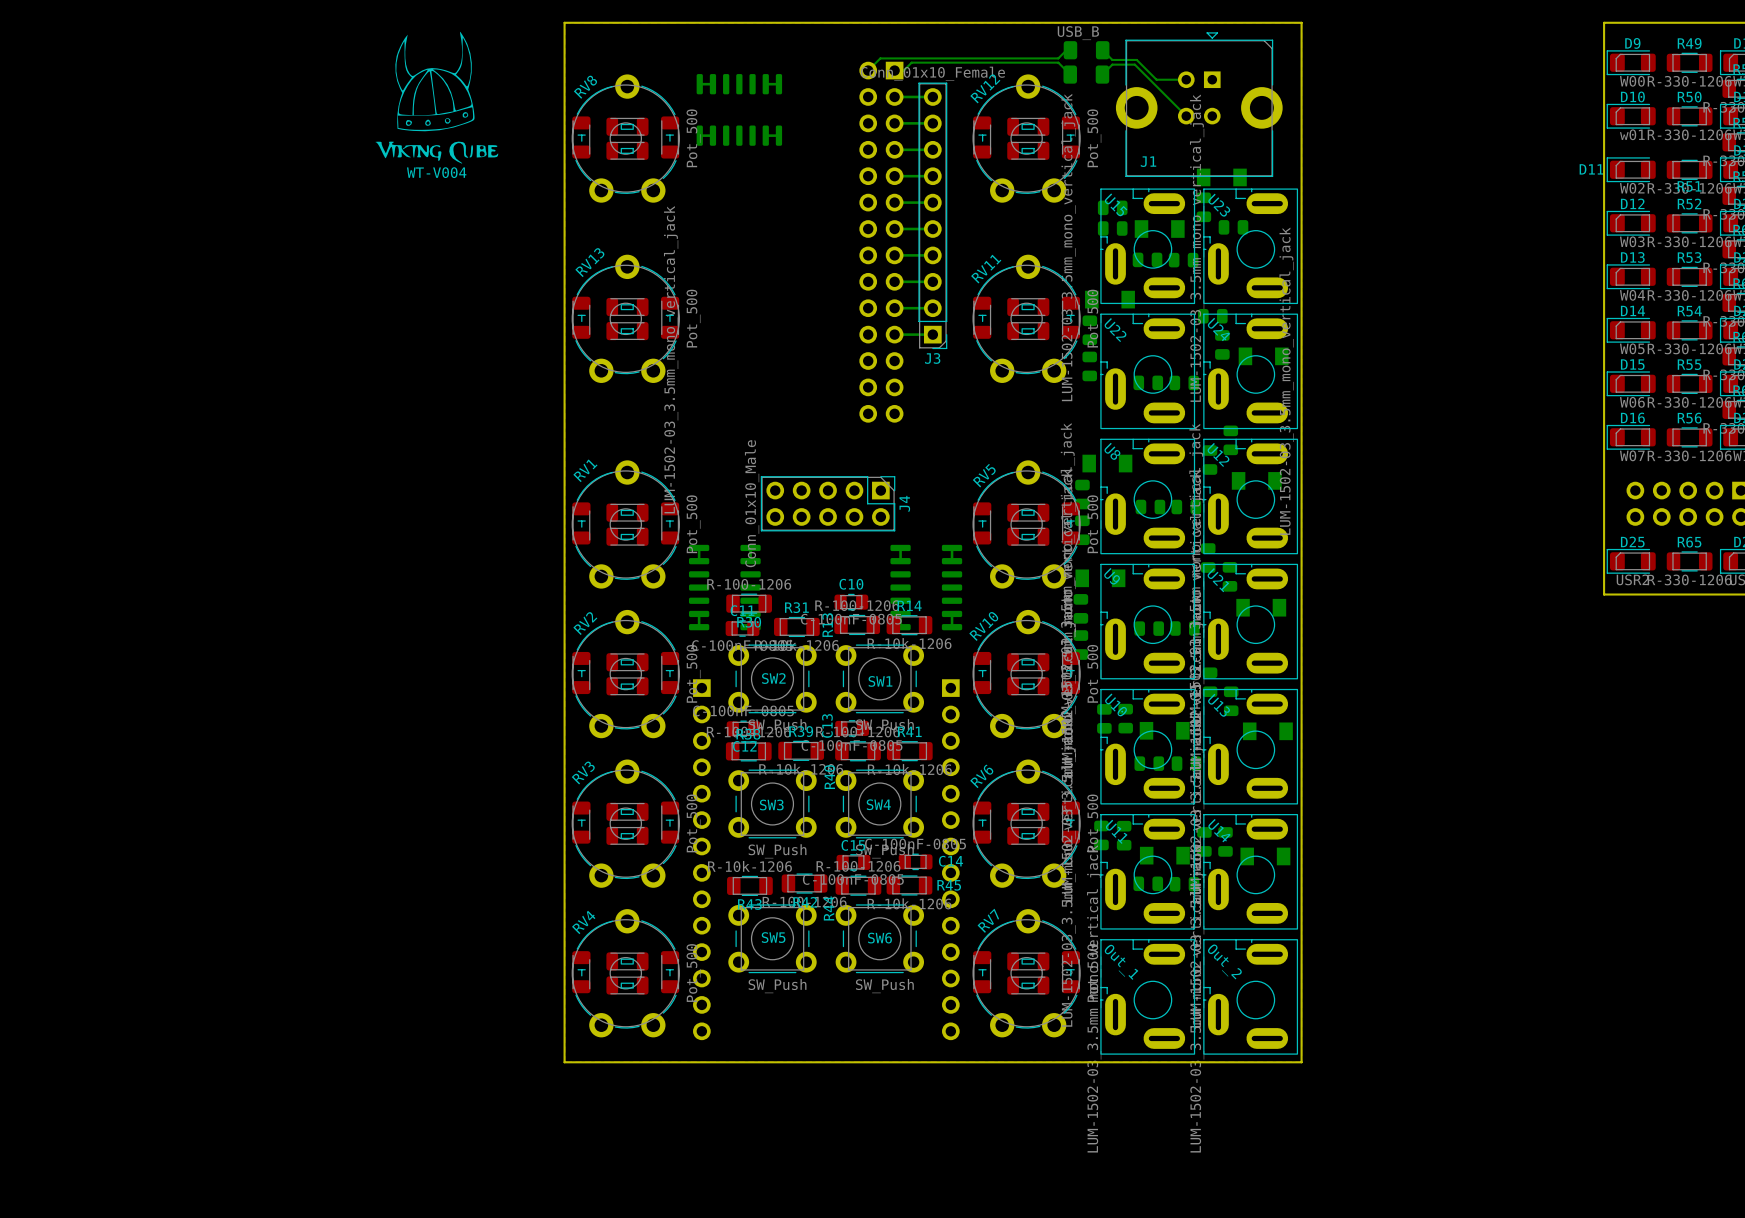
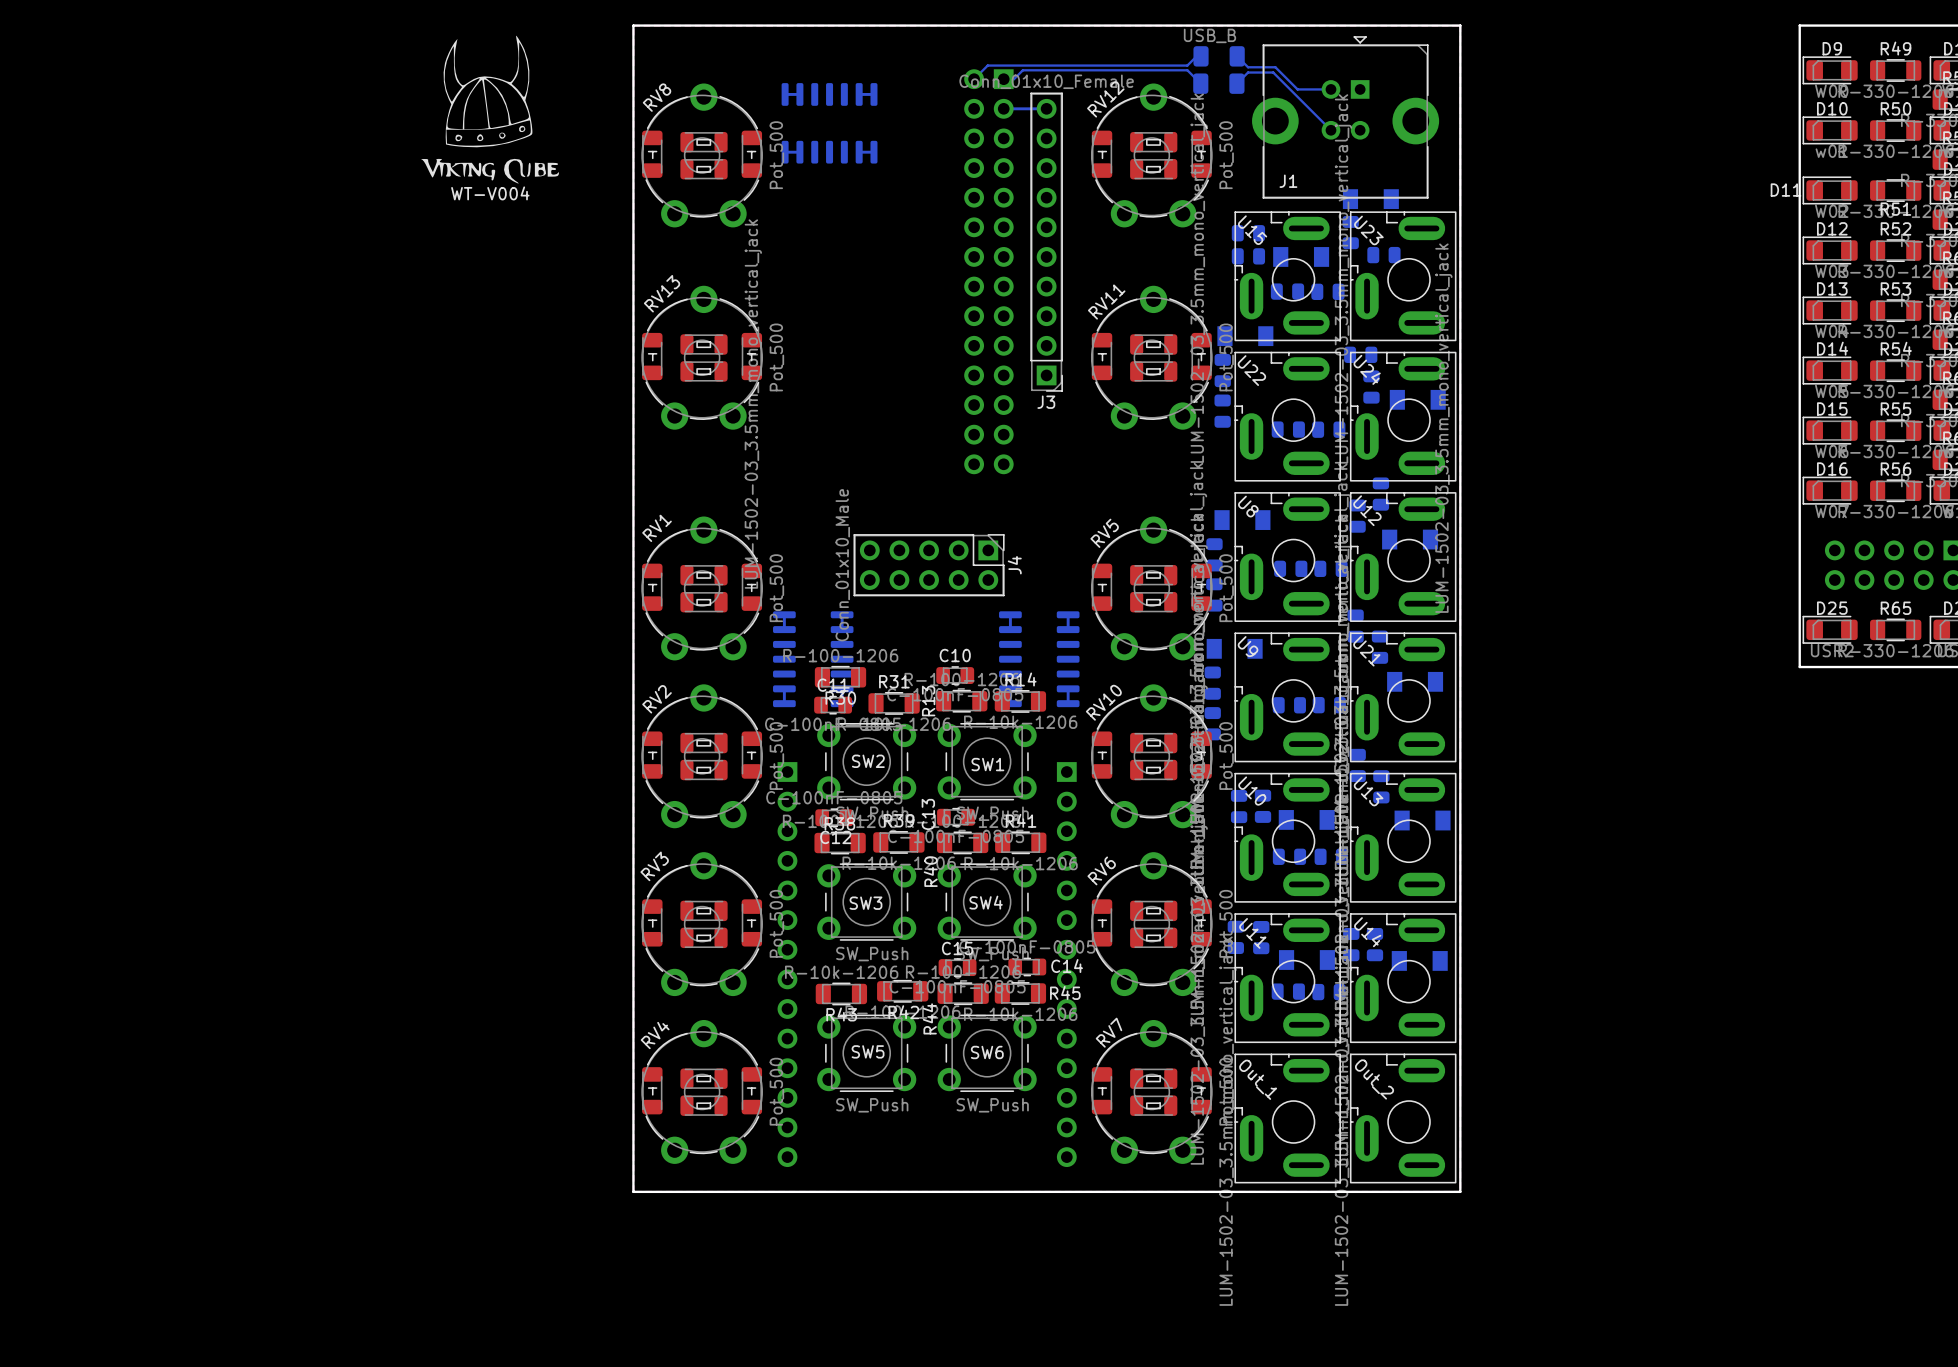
bottom track: (894, 123) (932, 123) -> none
bottom track: (894, 149) (932, 149) -> none
bottom track: (894, 176) (932, 176) -> none
bottom track: (894, 202) (932, 202) -> none
bottom track: (894, 228) (932, 228) -> none
bottom track: (894, 255) (932, 255) -> none
bottom track: (894, 281) (932, 281) -> none
bottom track: (894, 308) (932, 308) -> none
bottom track: (894, 334) (932, 334) -> none

